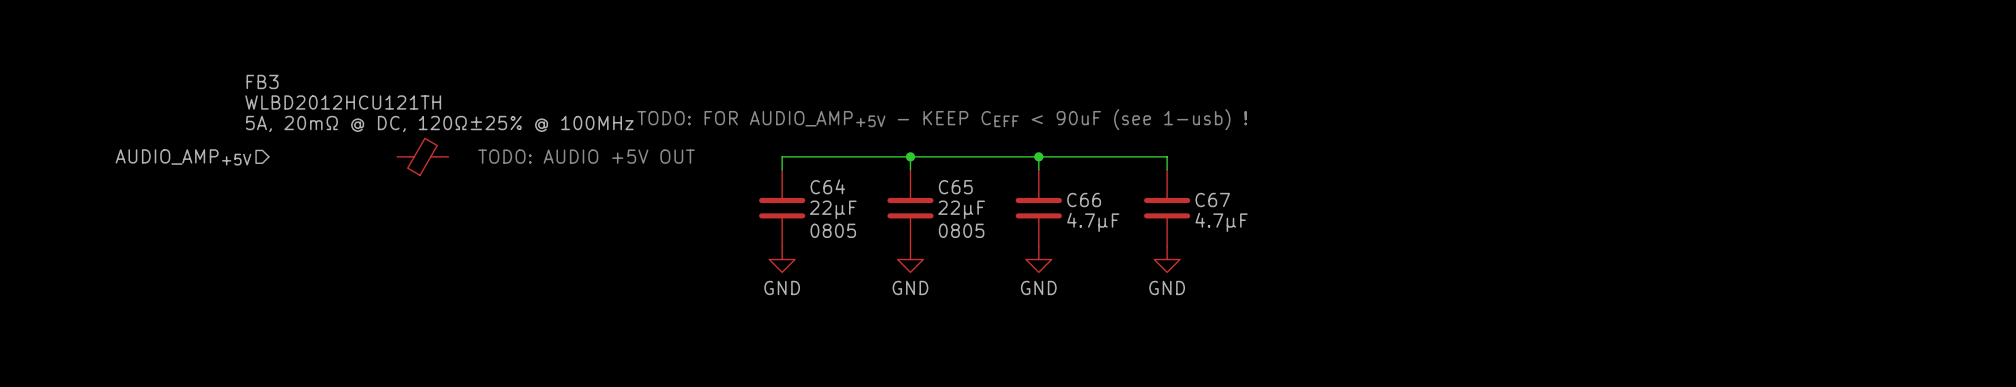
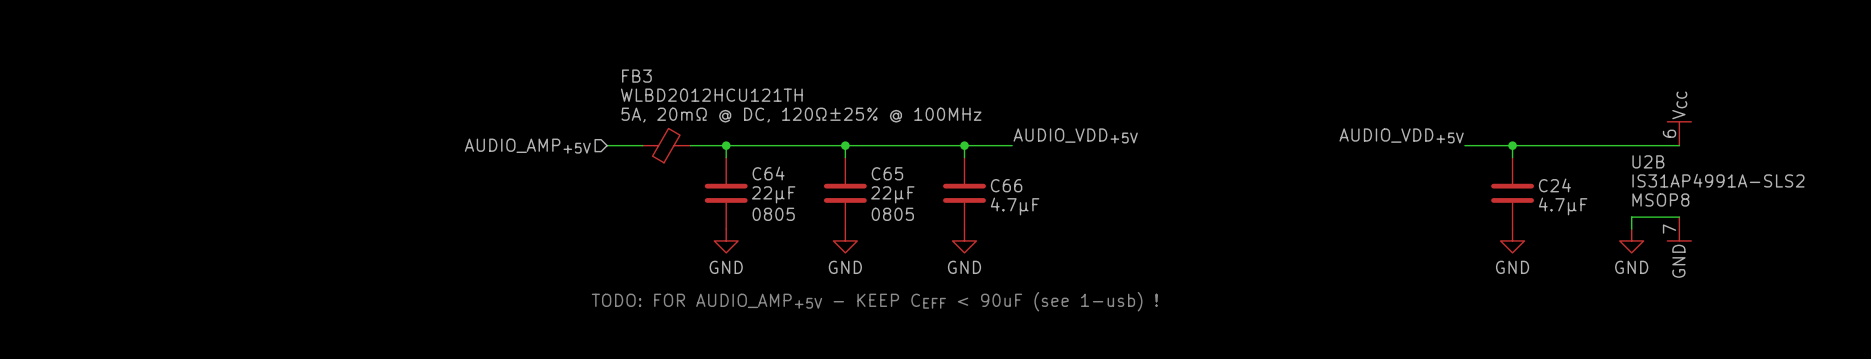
FB3 name position: FB3 (262, 81) -> FB3 (636, 76)
FB3 value position: WLBD2012HCU121TH (343, 102) -> WLBD2012HCU121TH (711, 95)
text position: TODO: FOR AUDIO_AMP+5V - KEEP CEFF < 90uF (see 1-usb) ! (942, 119) -> TODO: FOR AUDIO_AMP+5V - KEEP CEFF < 90uF (see 1-usb) ! (874, 301)
FB3 text position: 5A, 20mΩ @ DC, 120Ω±25% @ 100MHz (439, 123) -> 5A, 20mΩ @ DC, 120Ω±25% @ 100MHz (801, 115)
label: none -> AUDIO_VDD+5V (1075, 135)
label: none -> AUDIO_VDD+5V (1401, 135)
FB3 position: (422, 156) -> (666, 145)
text: TODO: AUDIO +5V OUT (586, 156) -> none
wire: none -> (607, 145) (642, 145)
wire: none -> (690, 145) (726, 145)
junction: none -> (726, 145)
wire: (1090, 156) (1167, 156) (1167, 169) -> none
wire: none -> (1464, 145) (1679, 145)
wire: none -> (1512, 145) (1512, 157)
junction: none -> (1512, 145)
hierarchical label: AUDIO_AMP+5V (183, 157) -> none
hierarchical label: none -> AUDIO_AMP+5V (527, 146)
U2B: none -> IS31AP4991A-SLS2 (1679, 181)
C67: 4.7μF (1167, 208) -> none
C24: none -> 4.7μF (1512, 193)
wire: none -> (1679, 217) (1631, 217) (1631, 229)
power symbol: GND (1167, 259) -> none
power symbol: none -> GND (1512, 240)
power symbol: none -> GND (1631, 240)

